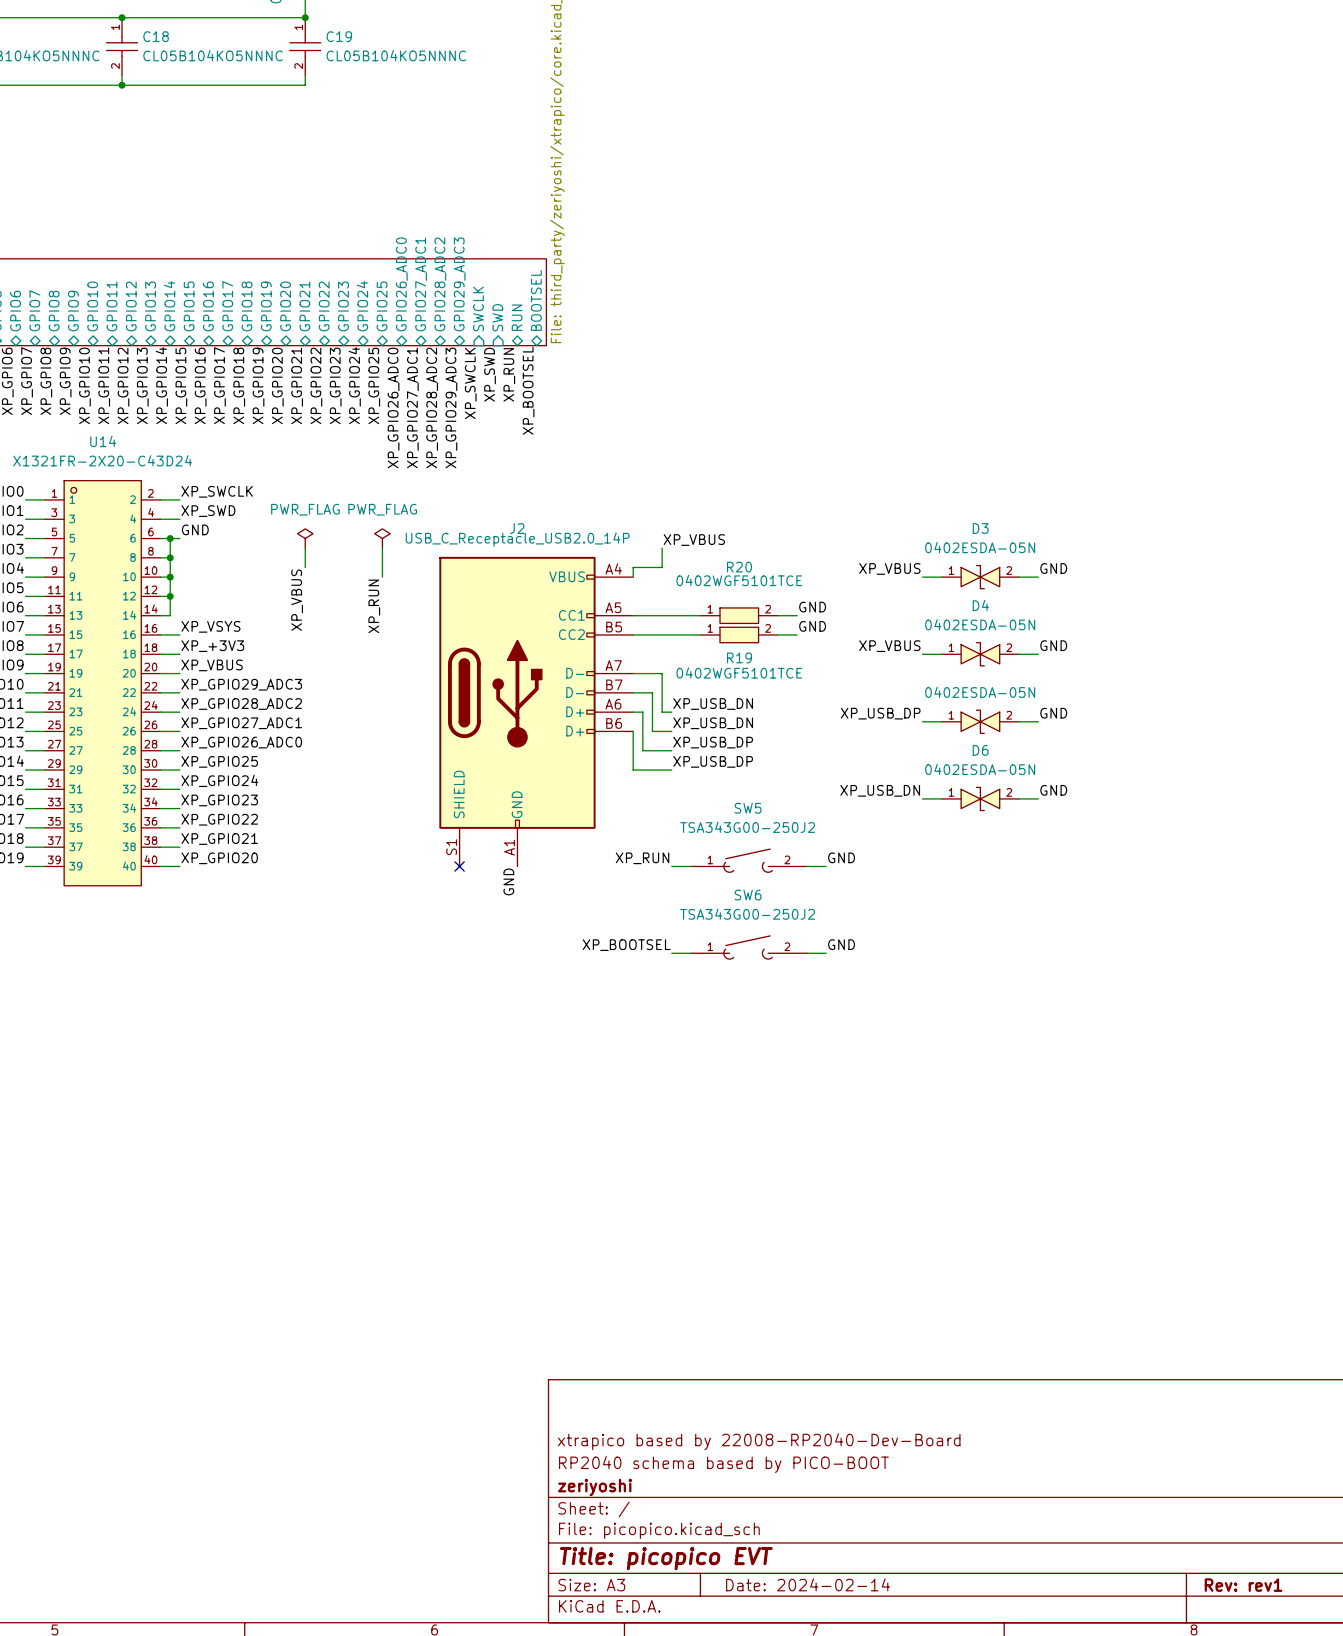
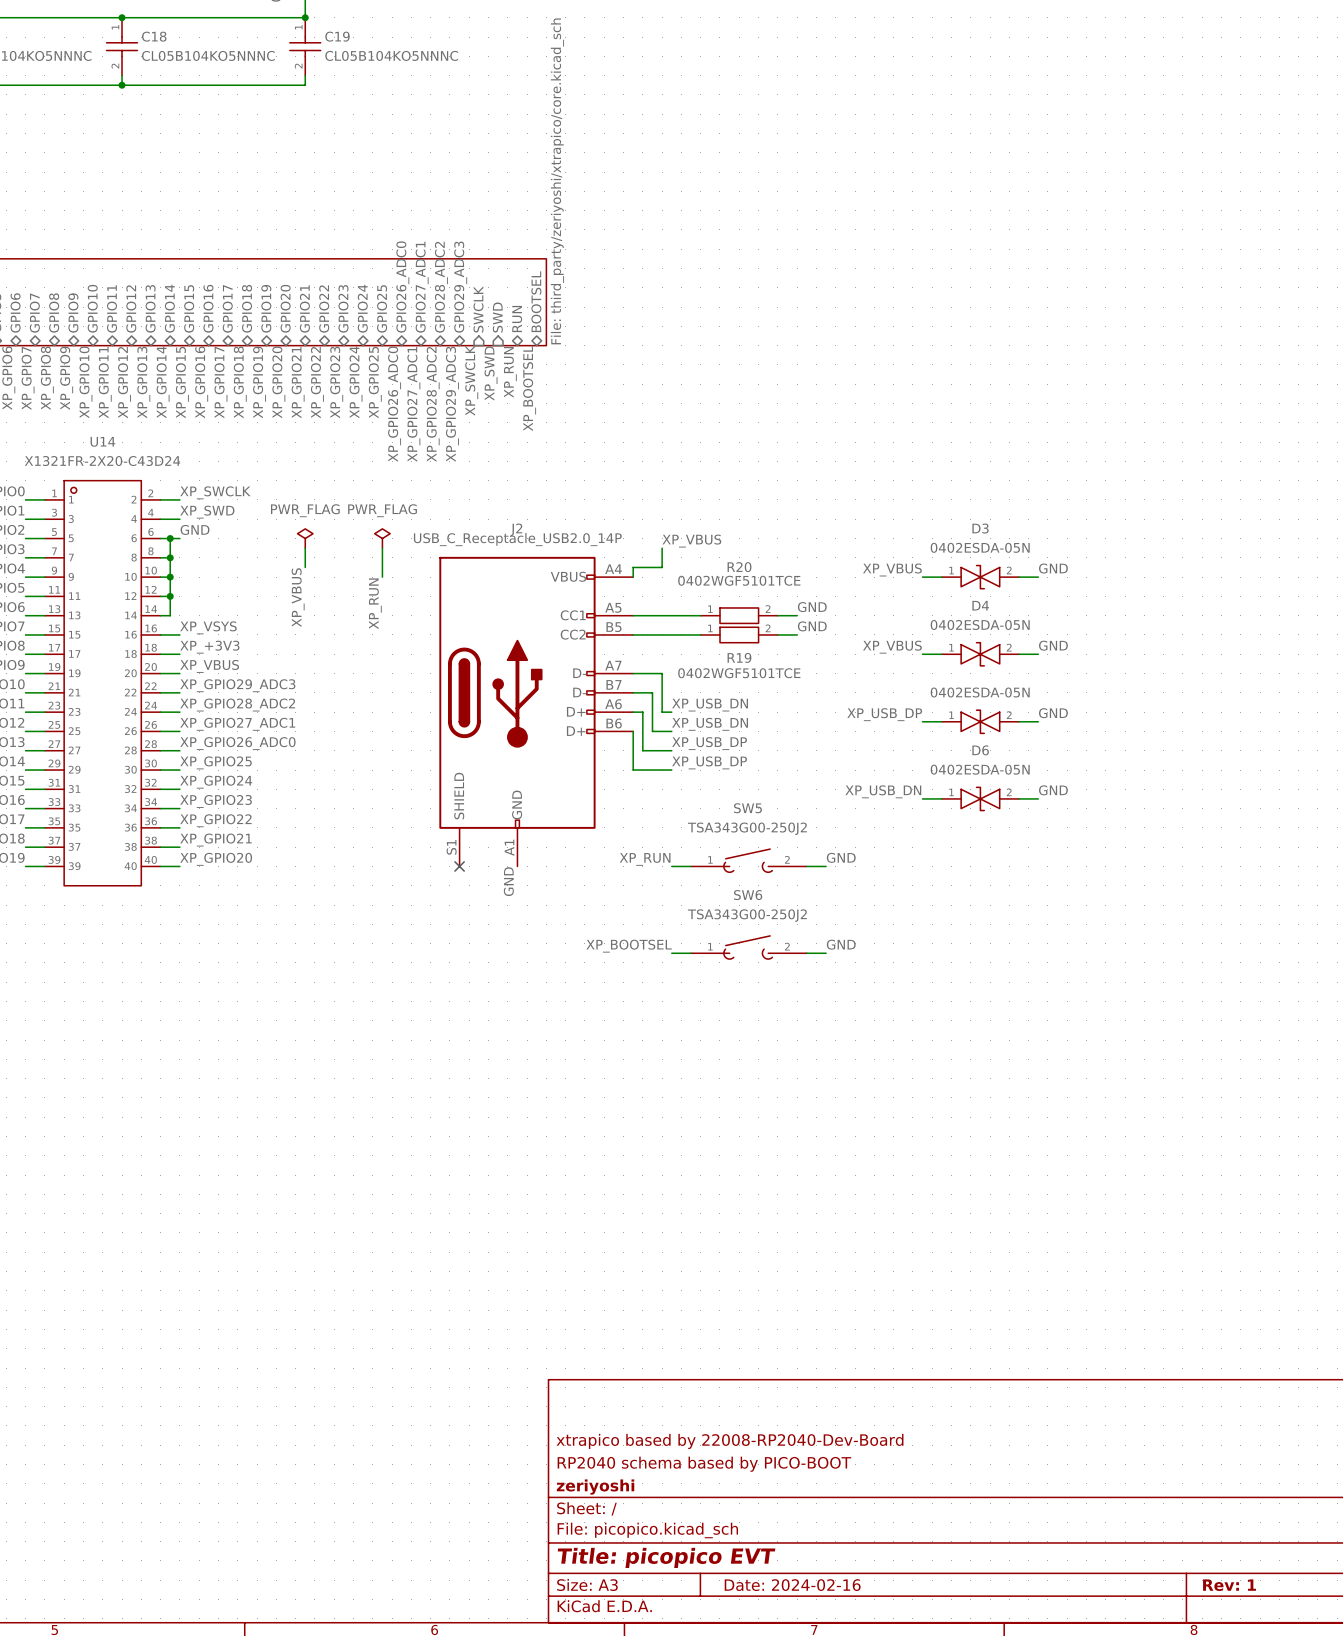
title block: Date: 2024-02-14 (808, 1584) -> Date: 2024-02-16 (792, 1585)
title block: Rev: rev1 (1243, 1585) -> Rev: 1 (1229, 1585)

